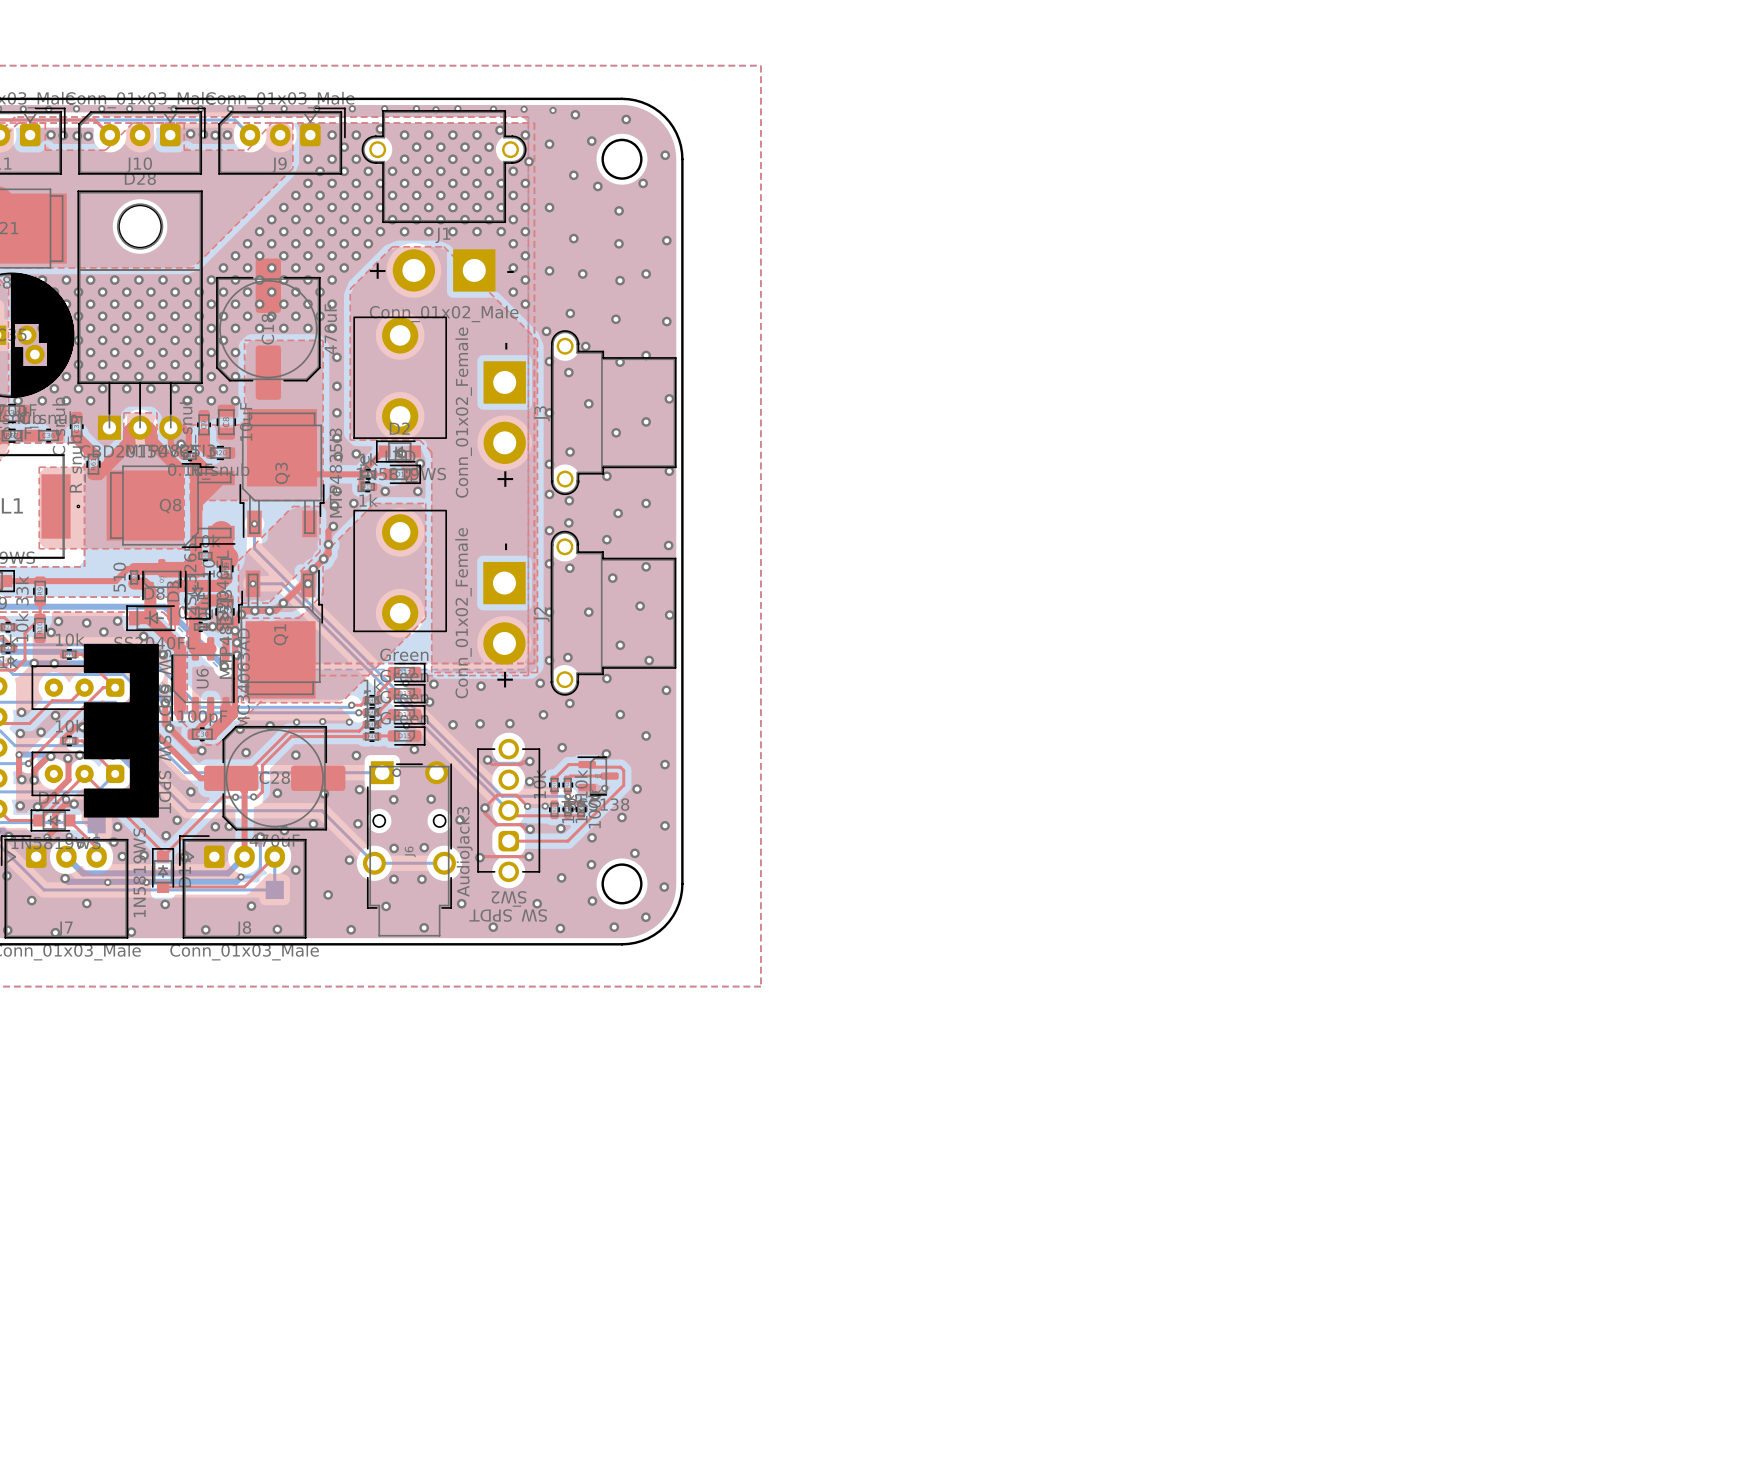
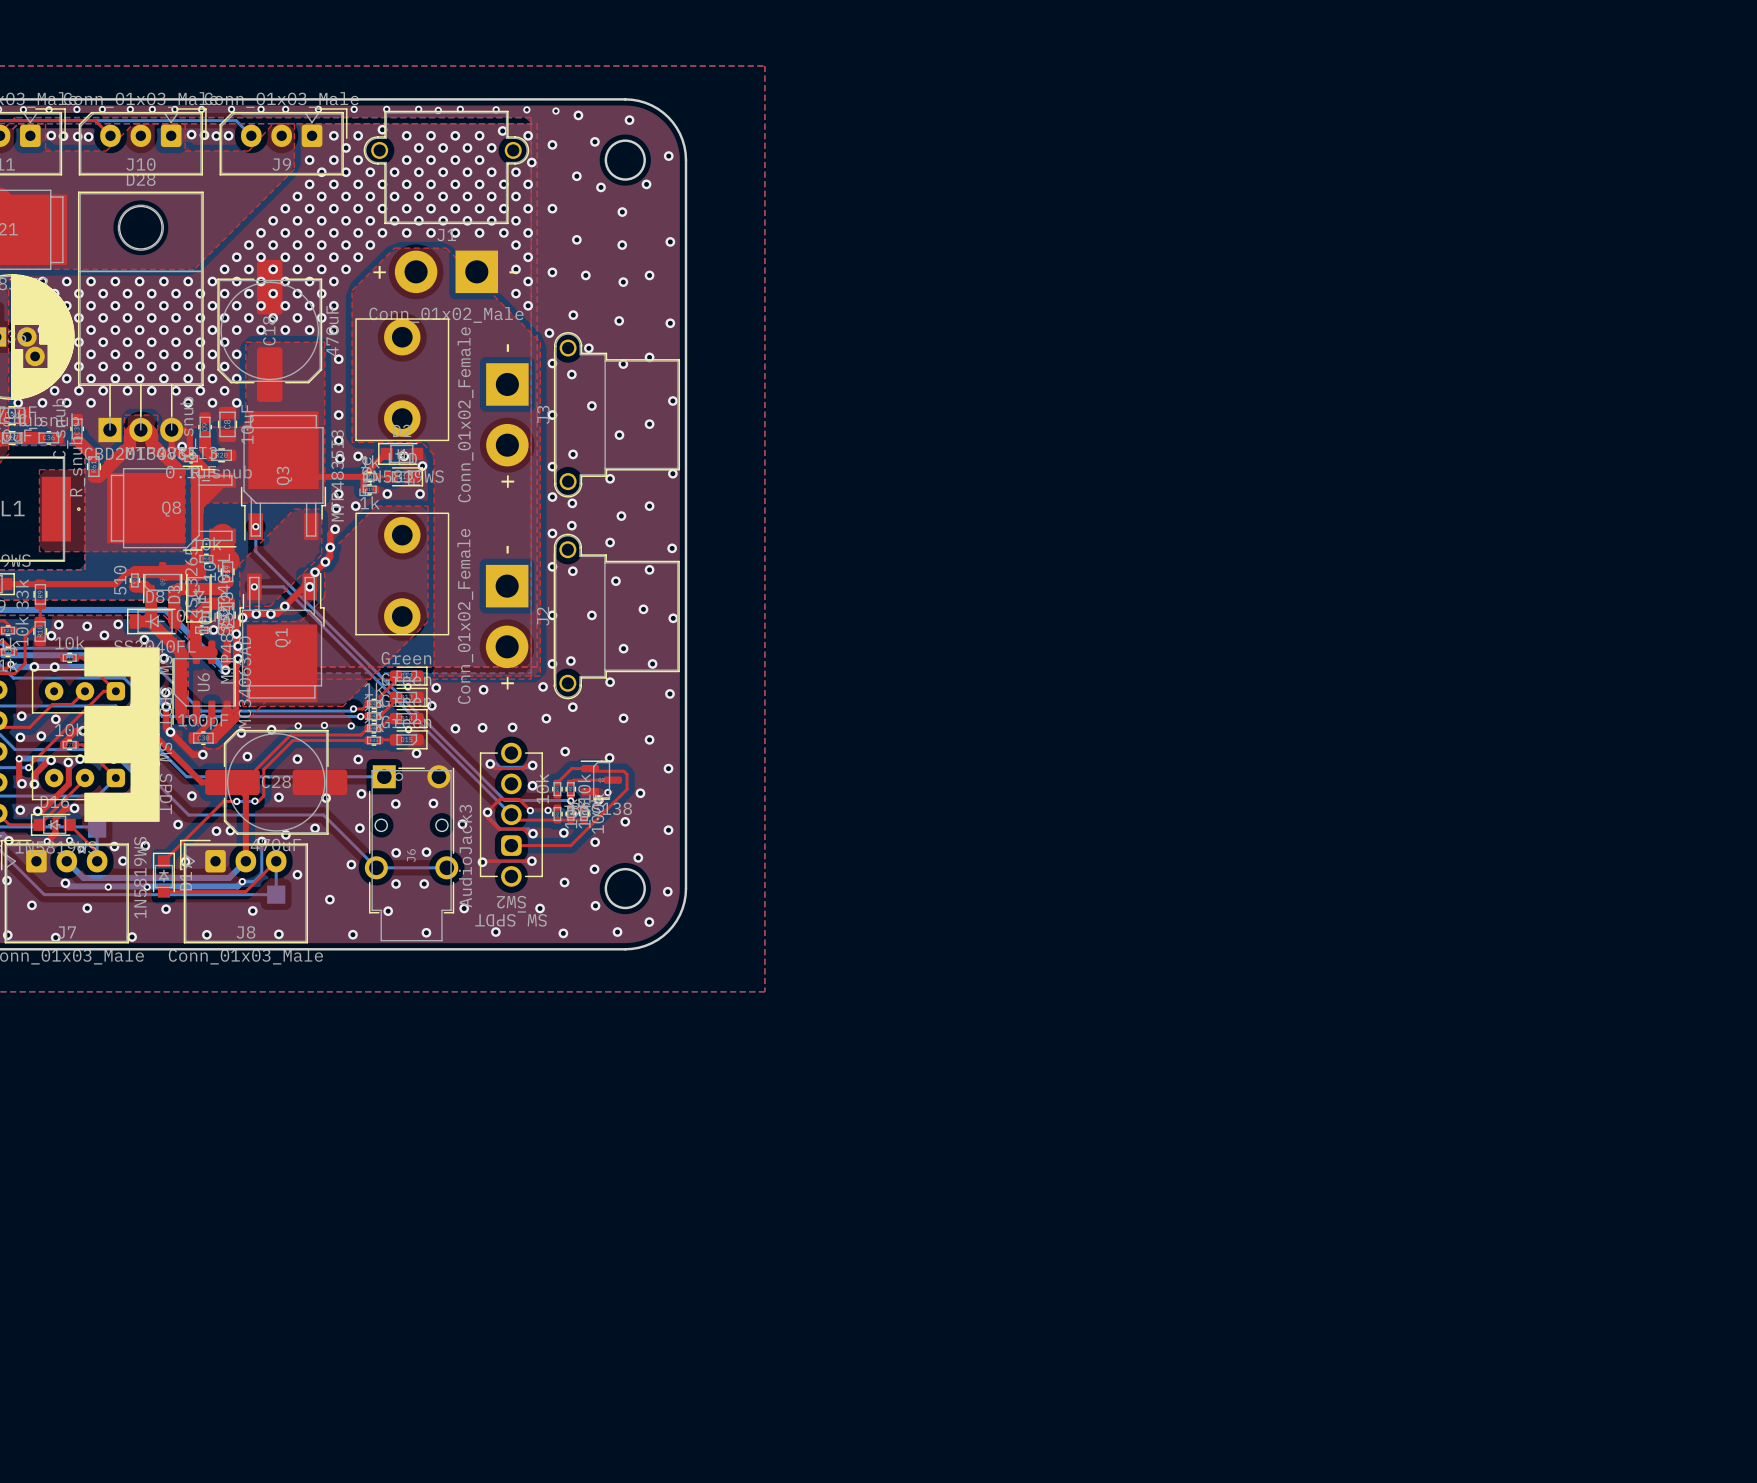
top track: (84, 773) (163, 852) (163, 856) -> none
via: (117, 826) -> none
via: (166, 835) -> none
via: none -> (145, 845)
via: (144, 855) -> none

